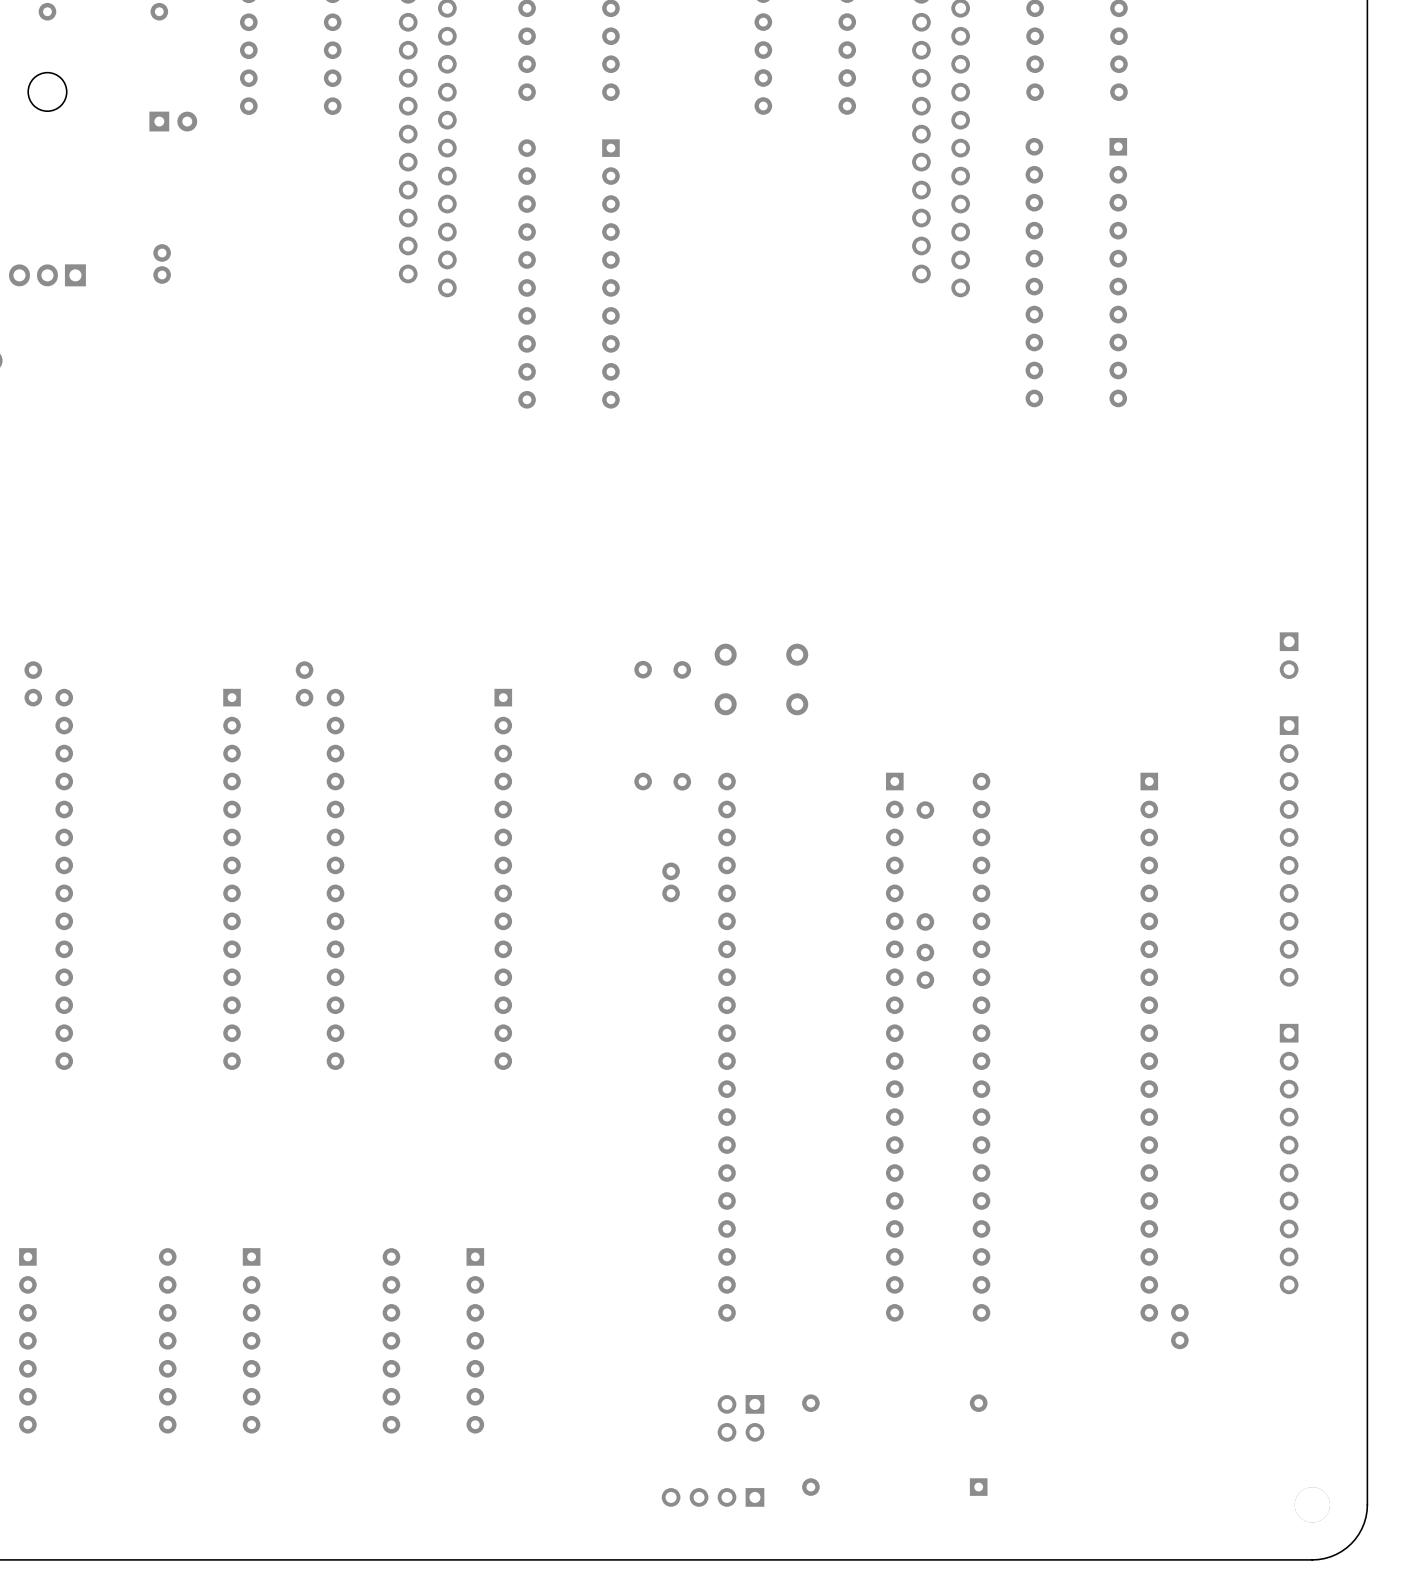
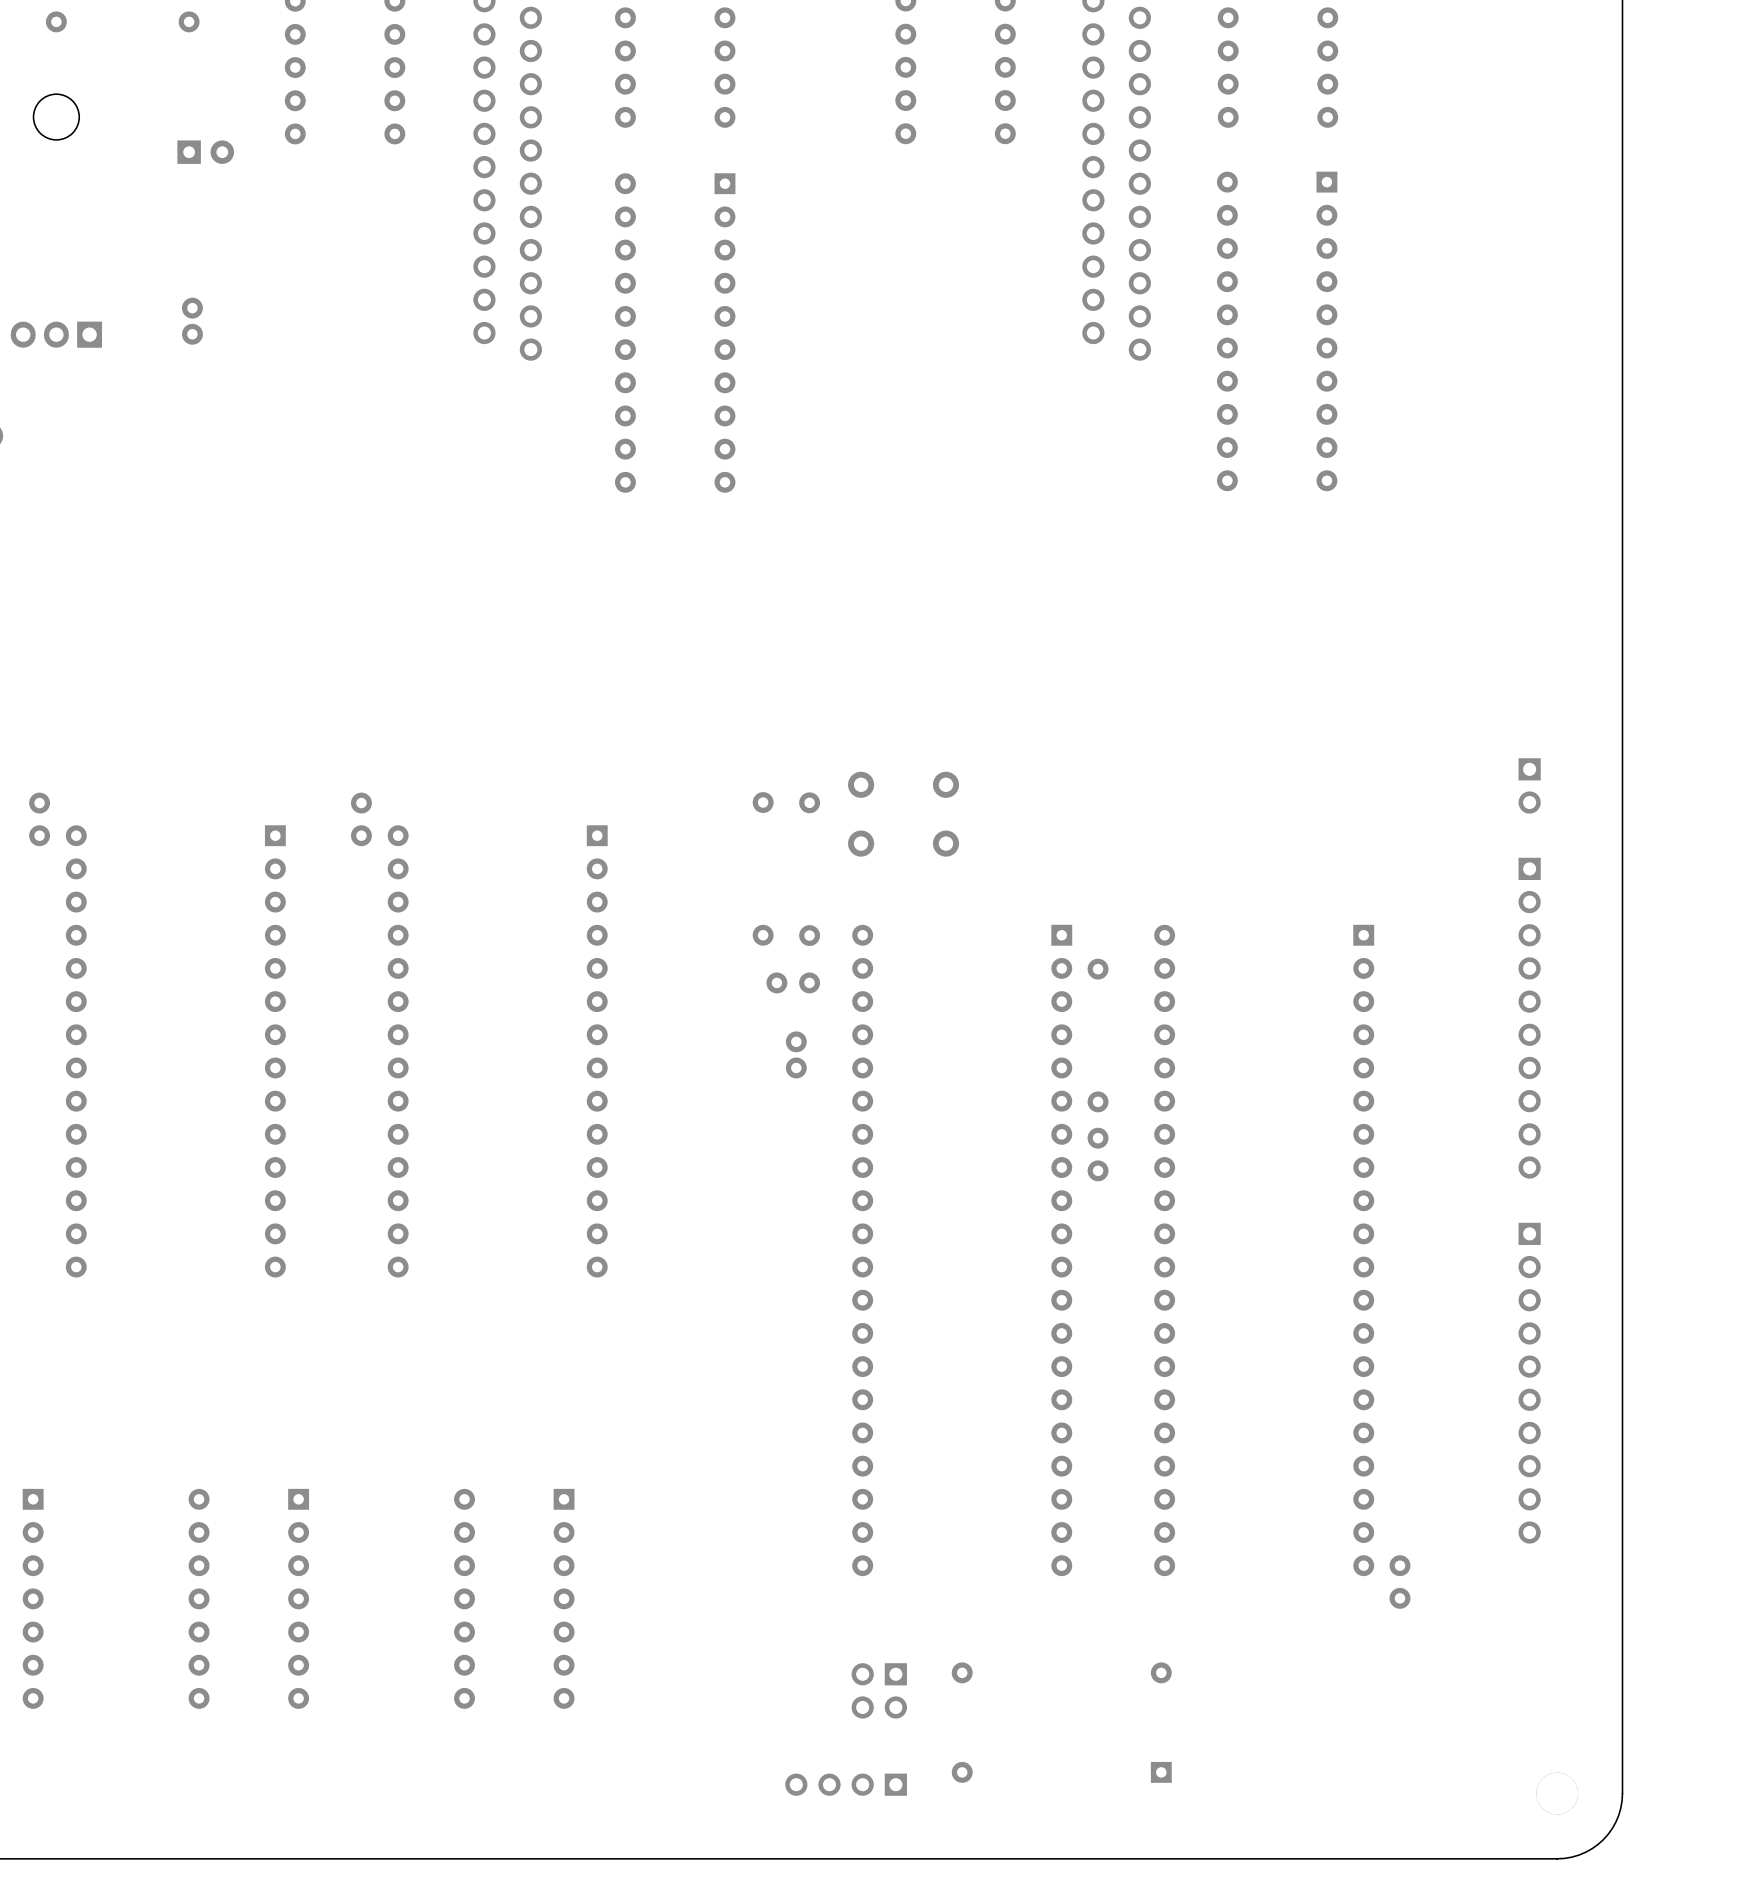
part: none -> (793, 982)

